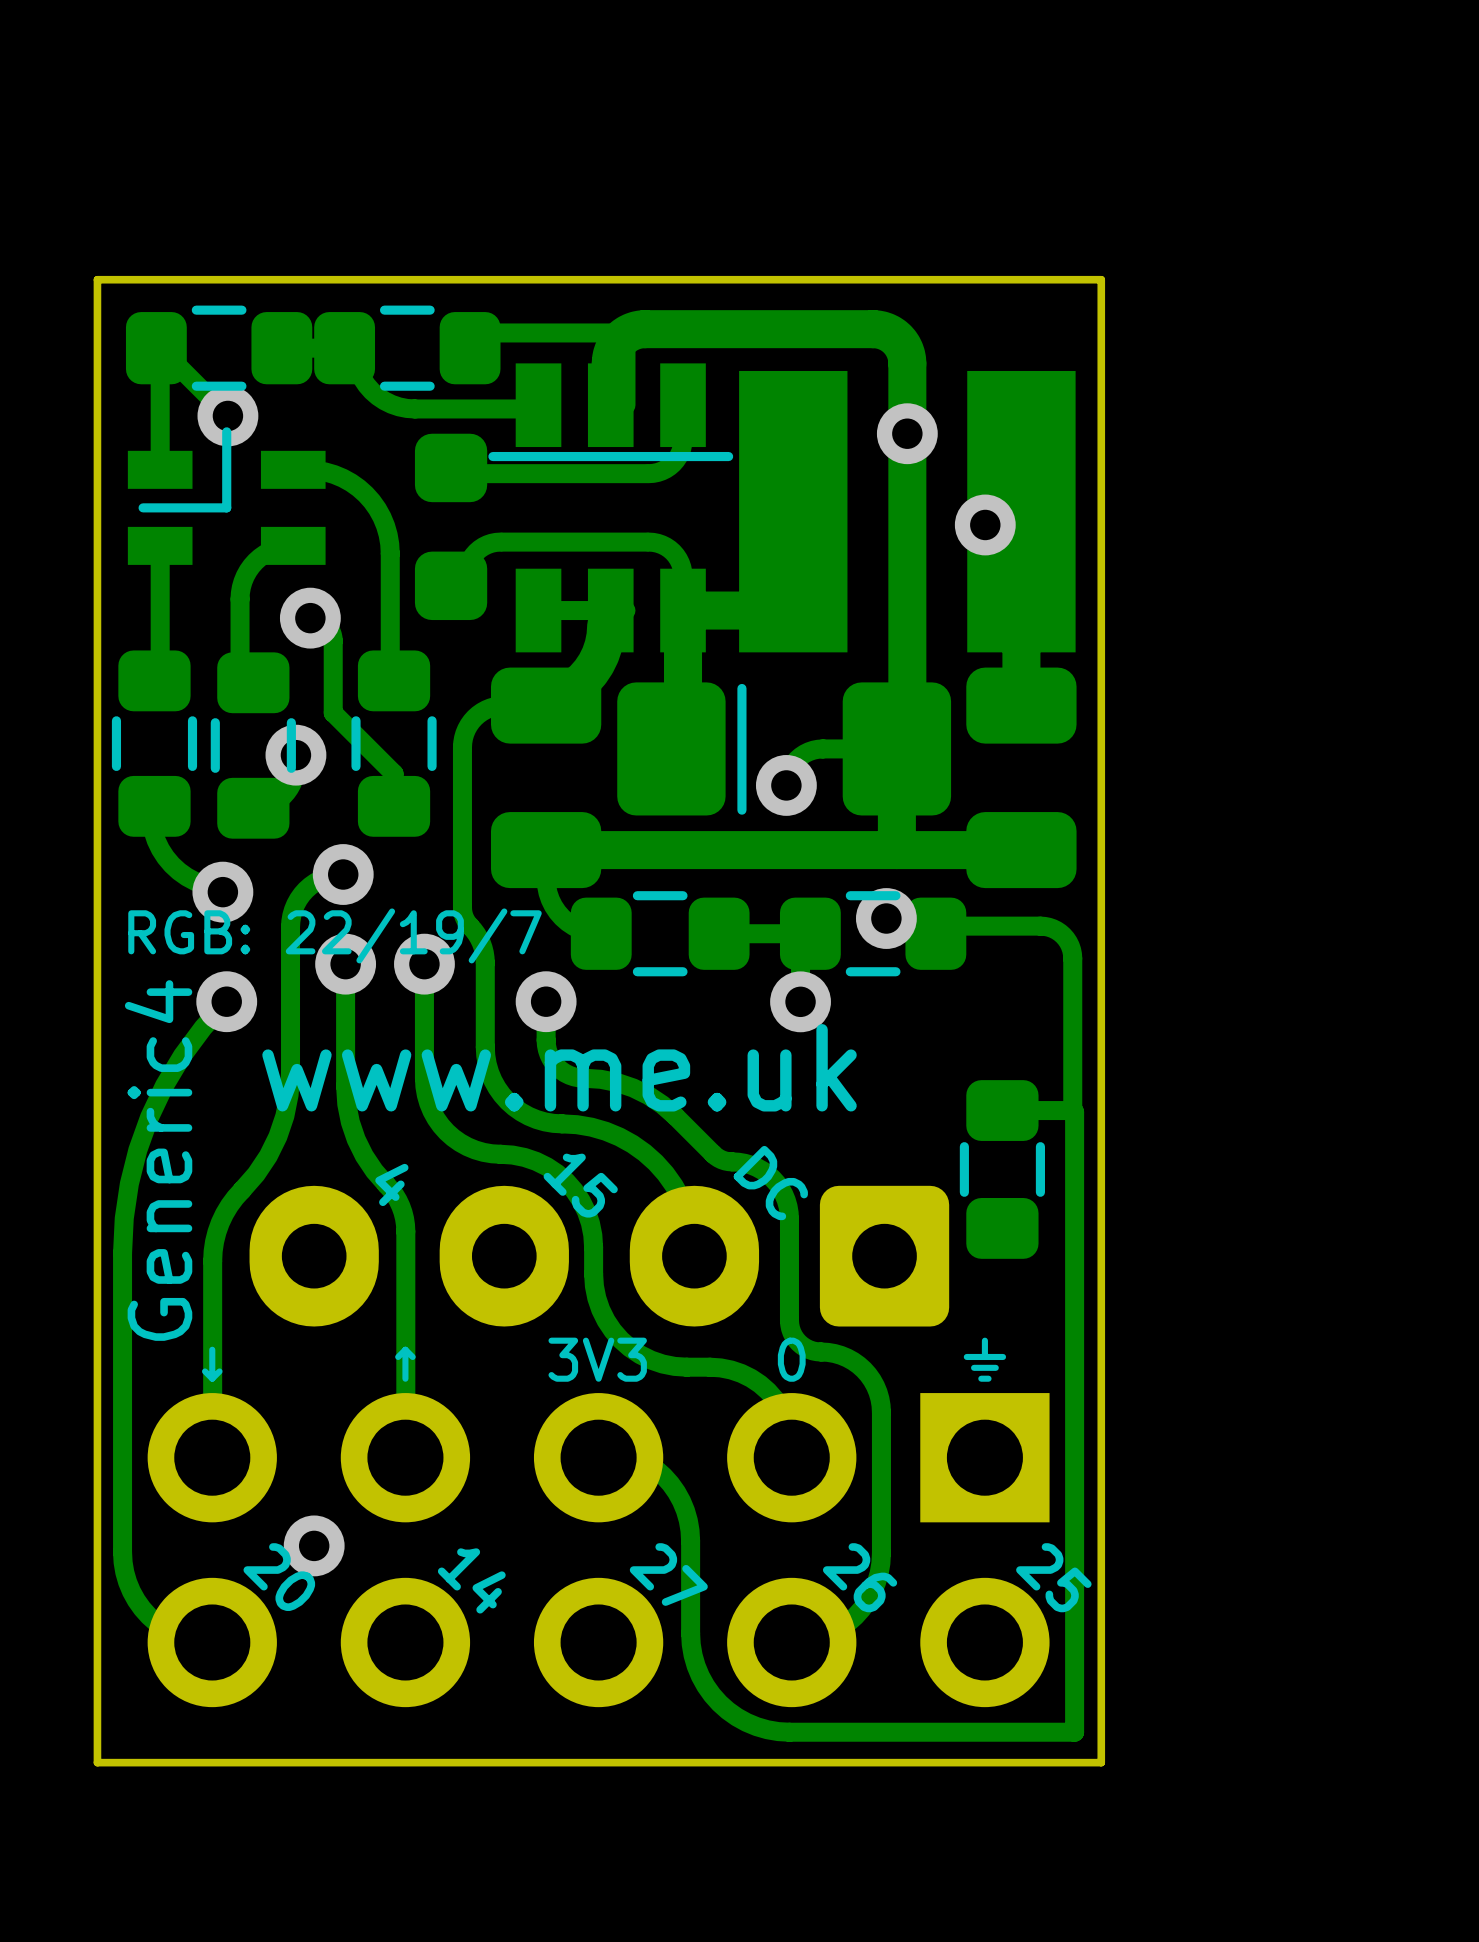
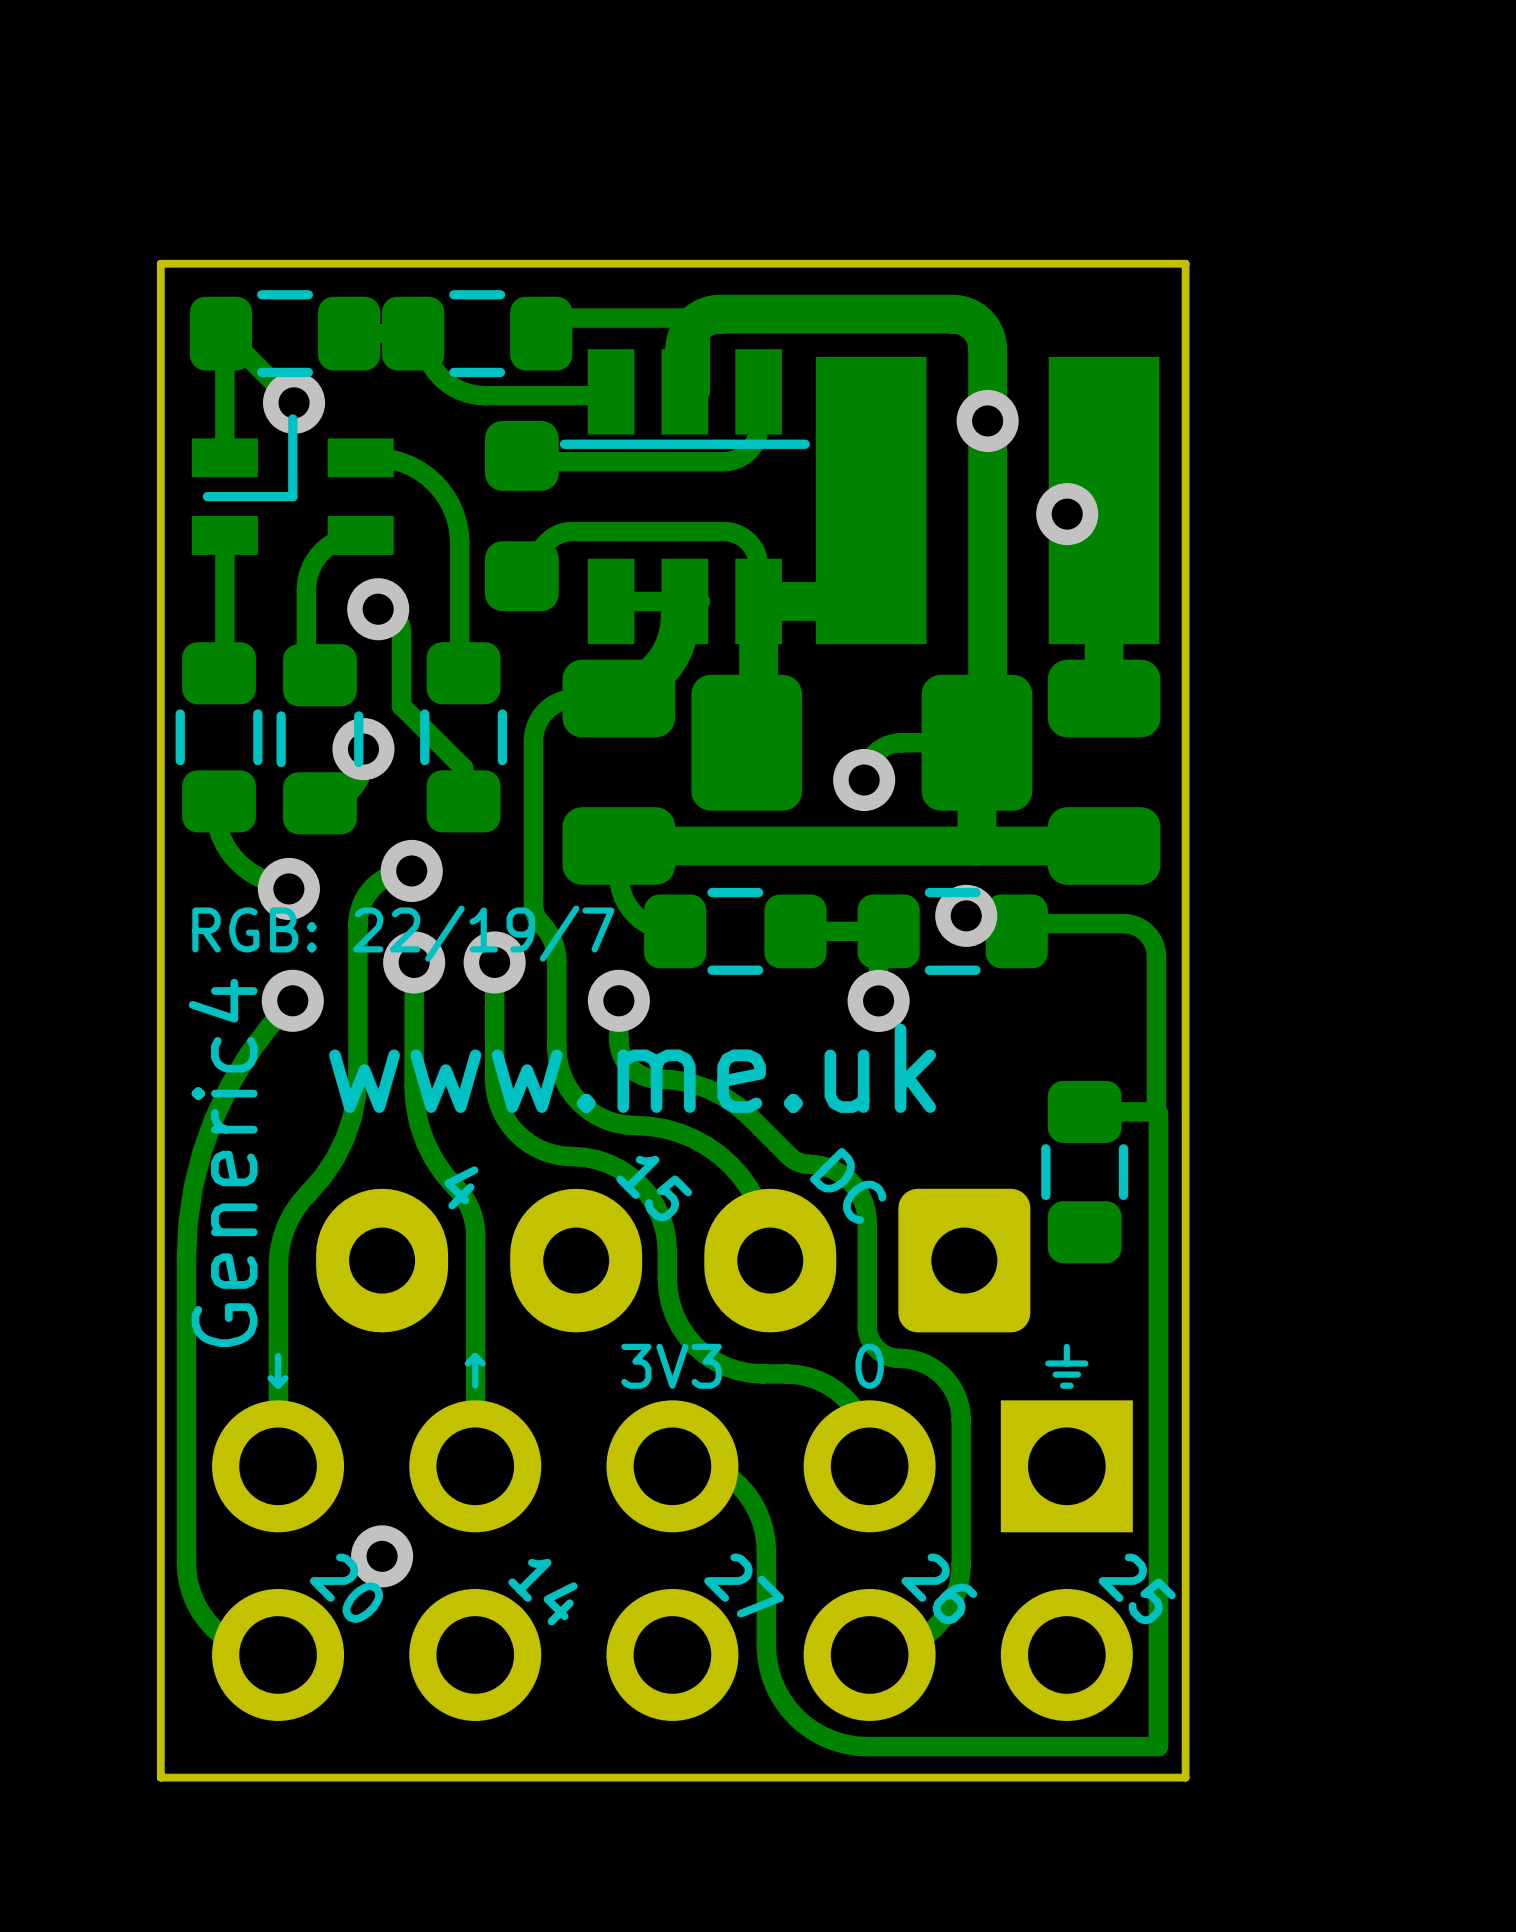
part footprint: [414, 310, 1077, 889] -> [484, 294, 1161, 885]

